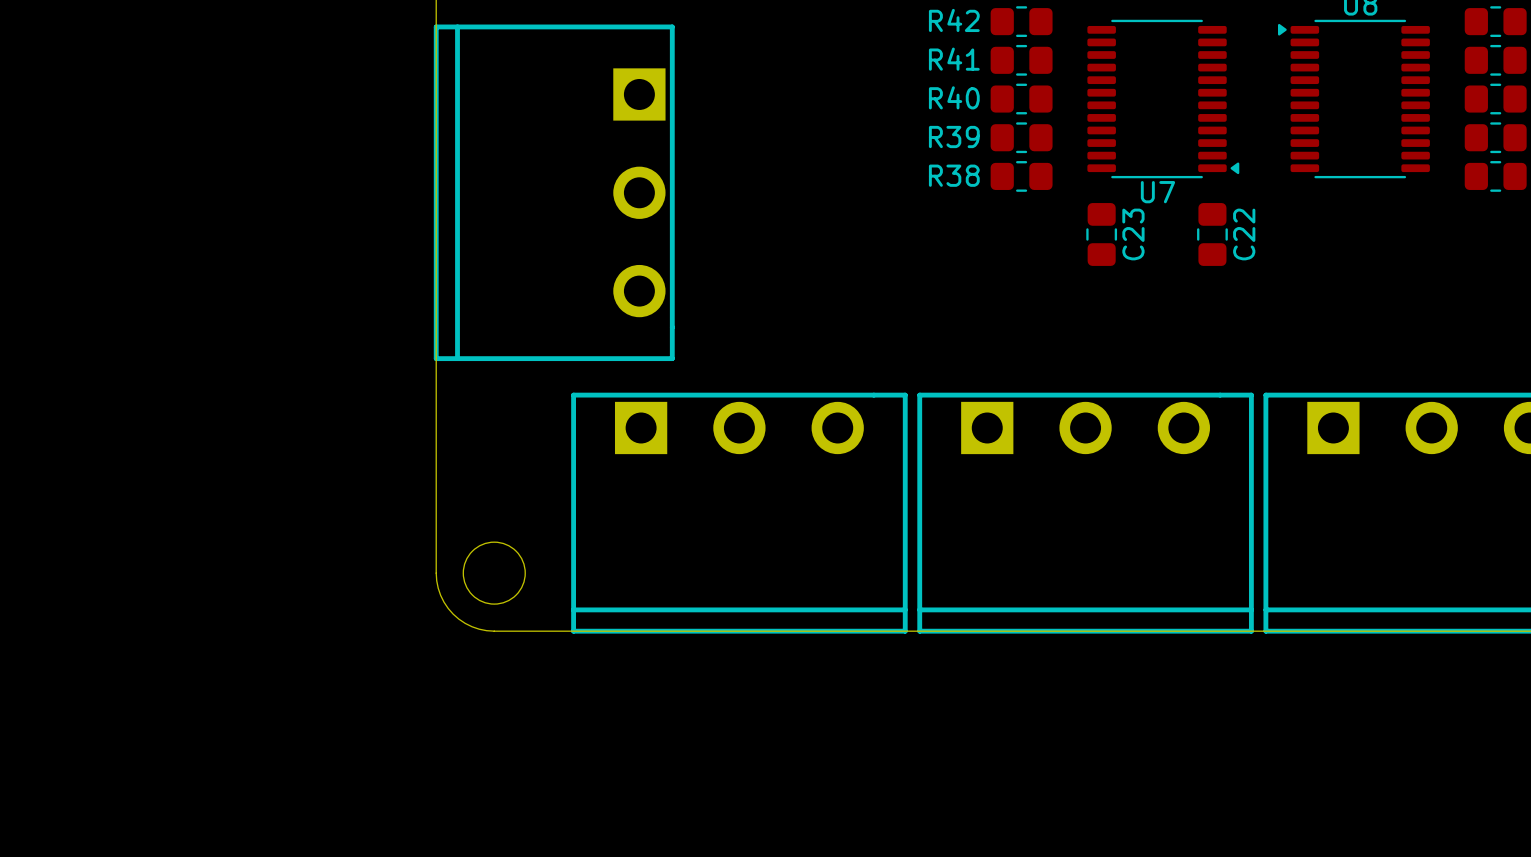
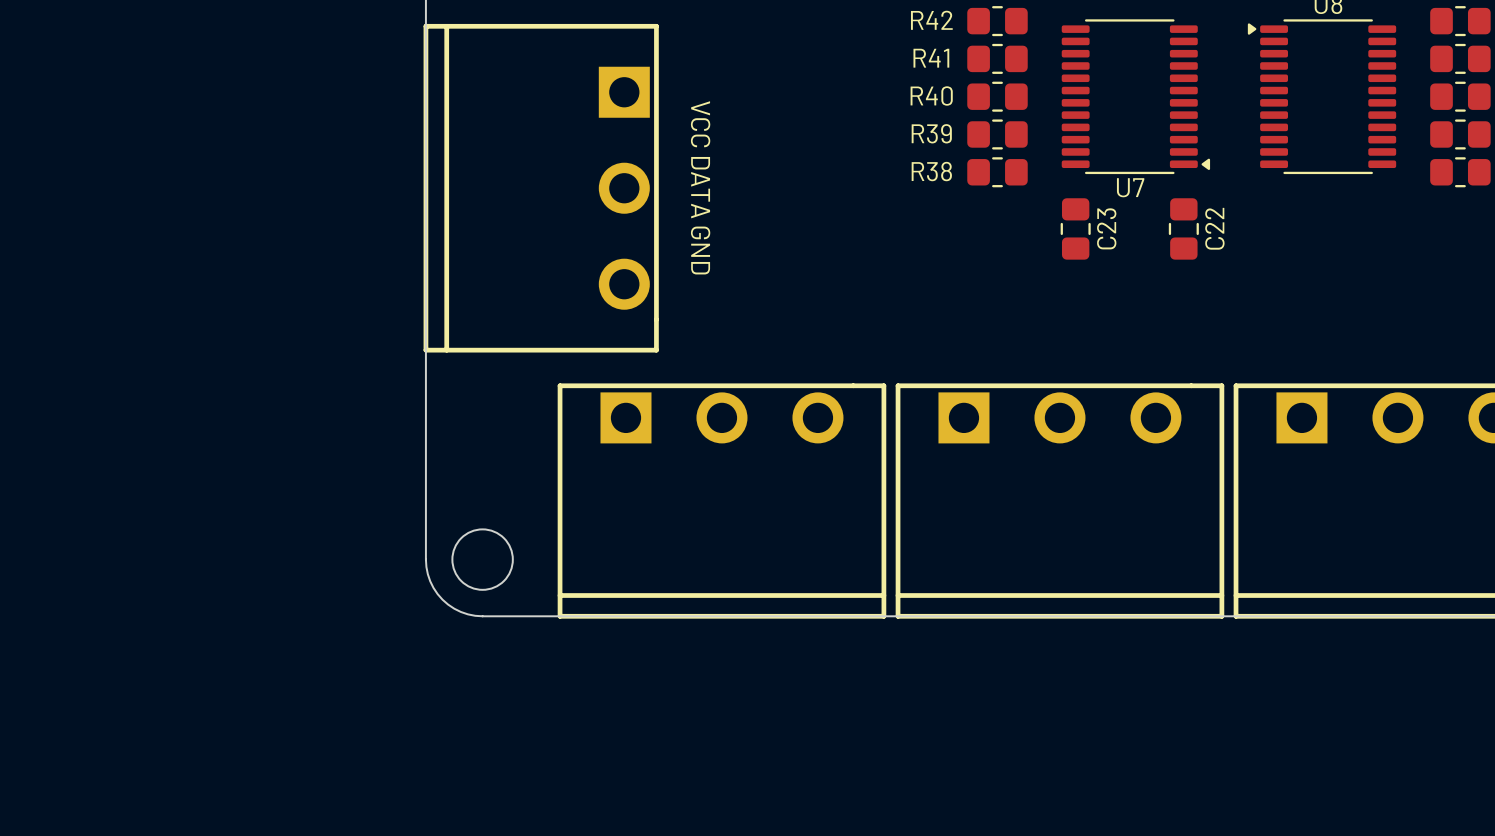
text: none -> VCC DATA GND (700, 187)

